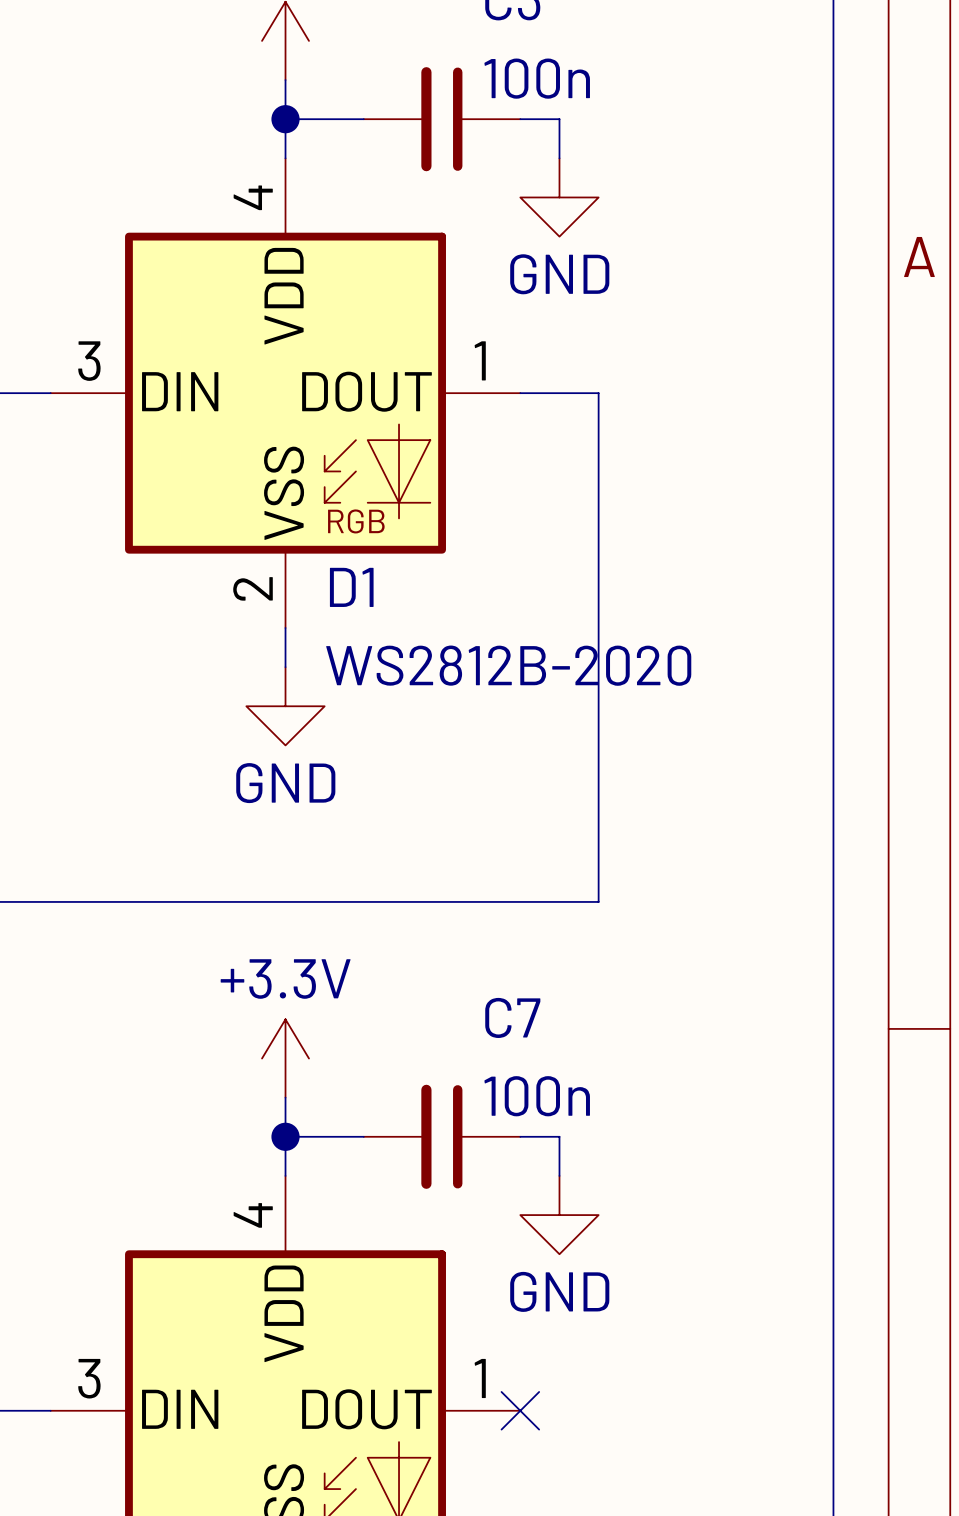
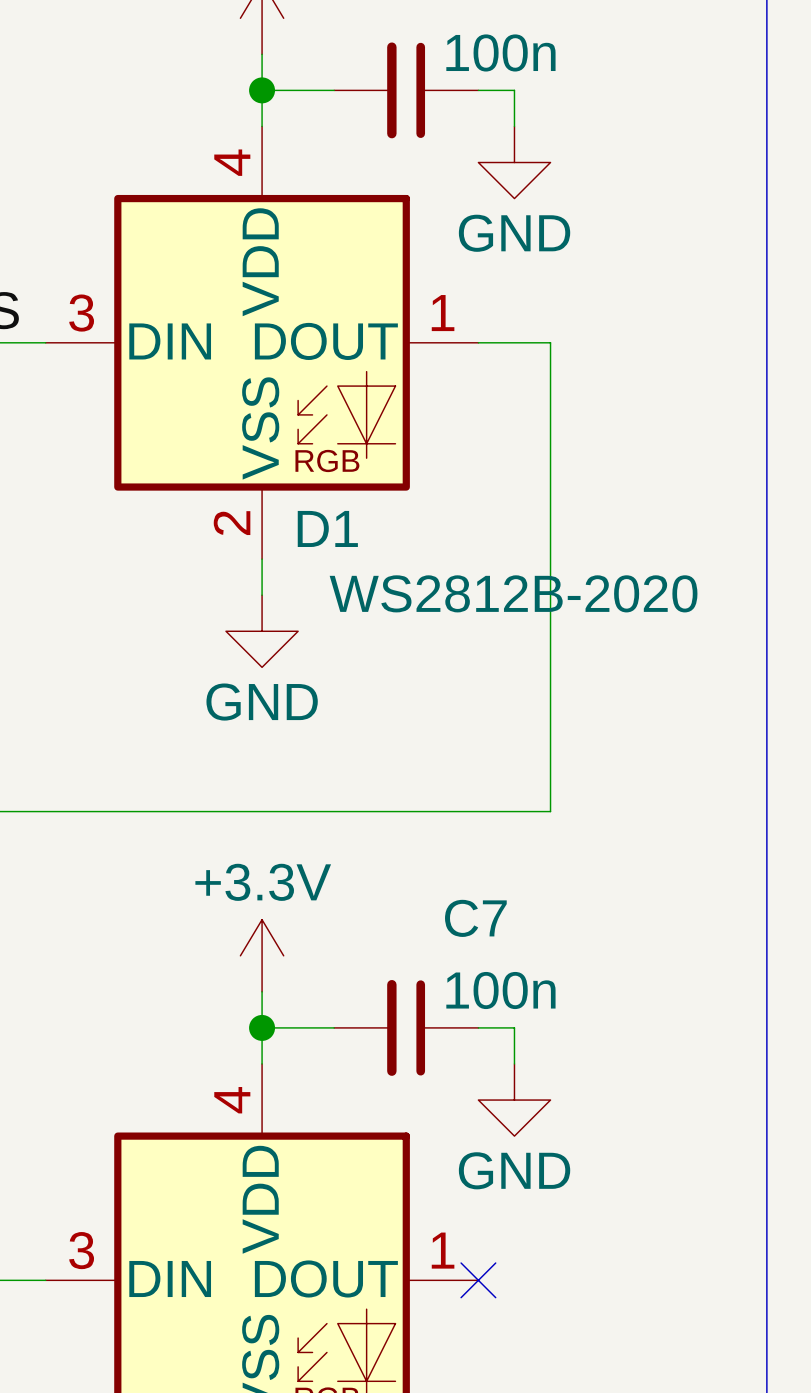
D1 name position: D1 (351, 587) -> D1 (327, 528)
D1 value position: WS2812B-2020 (508, 665) -> WS2812B-2020 (513, 593)

